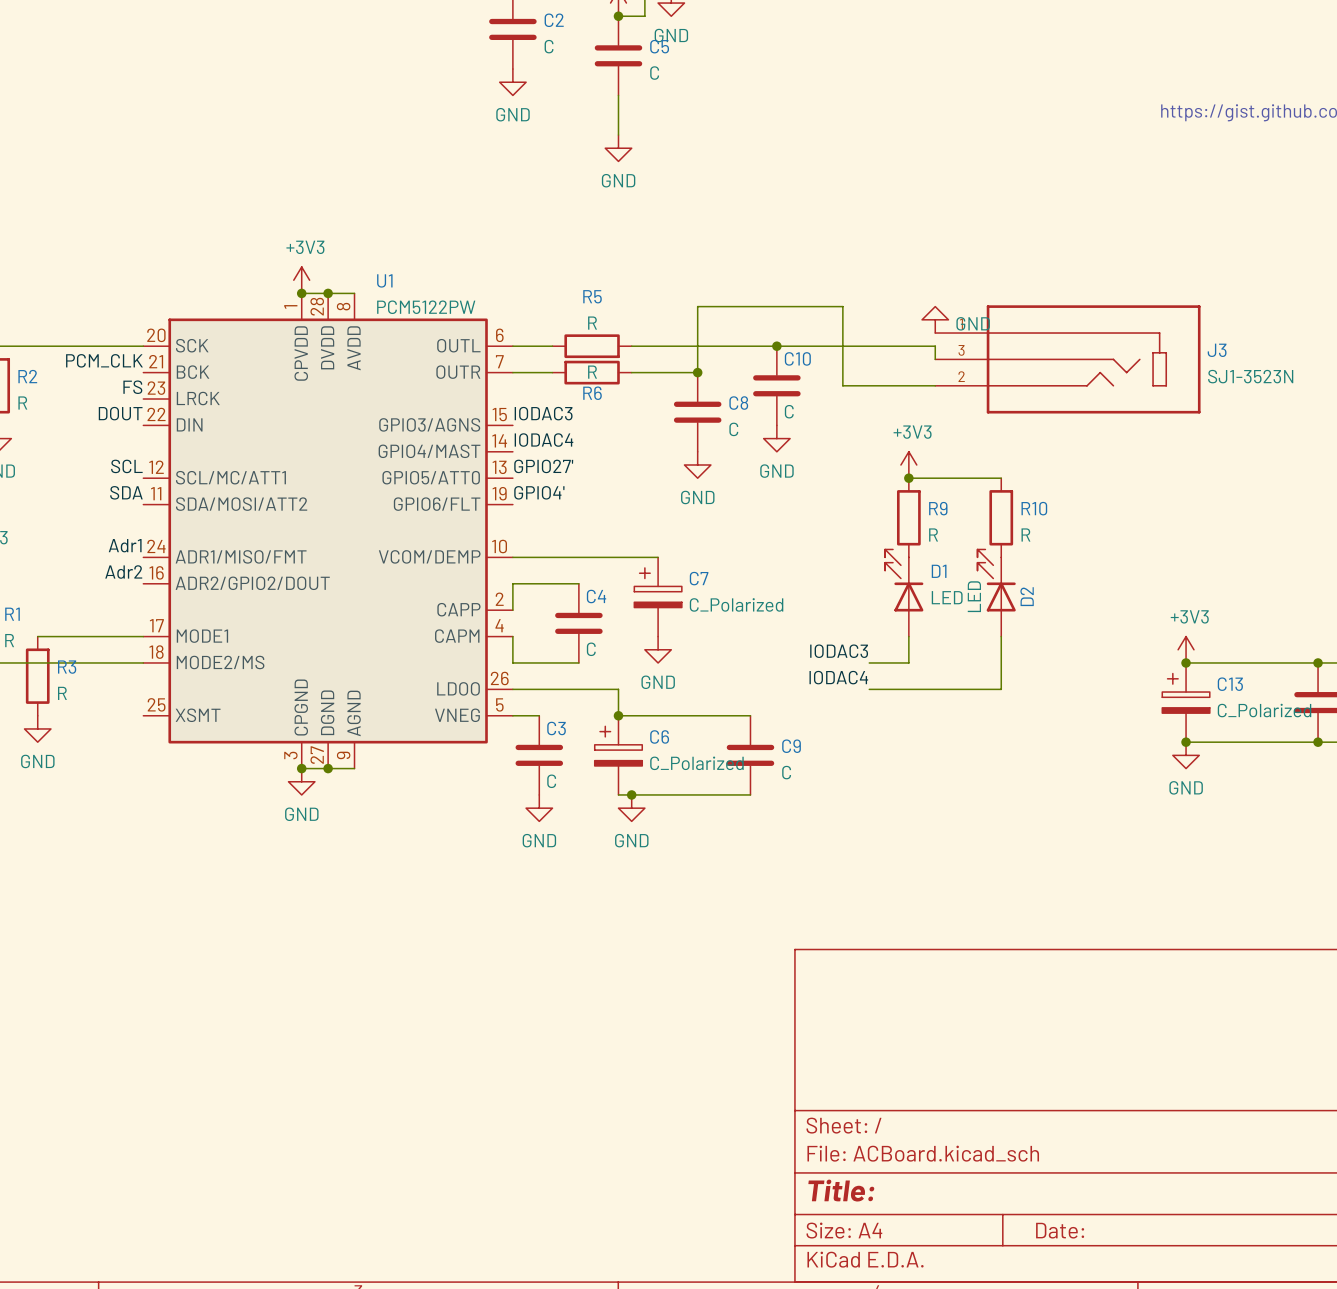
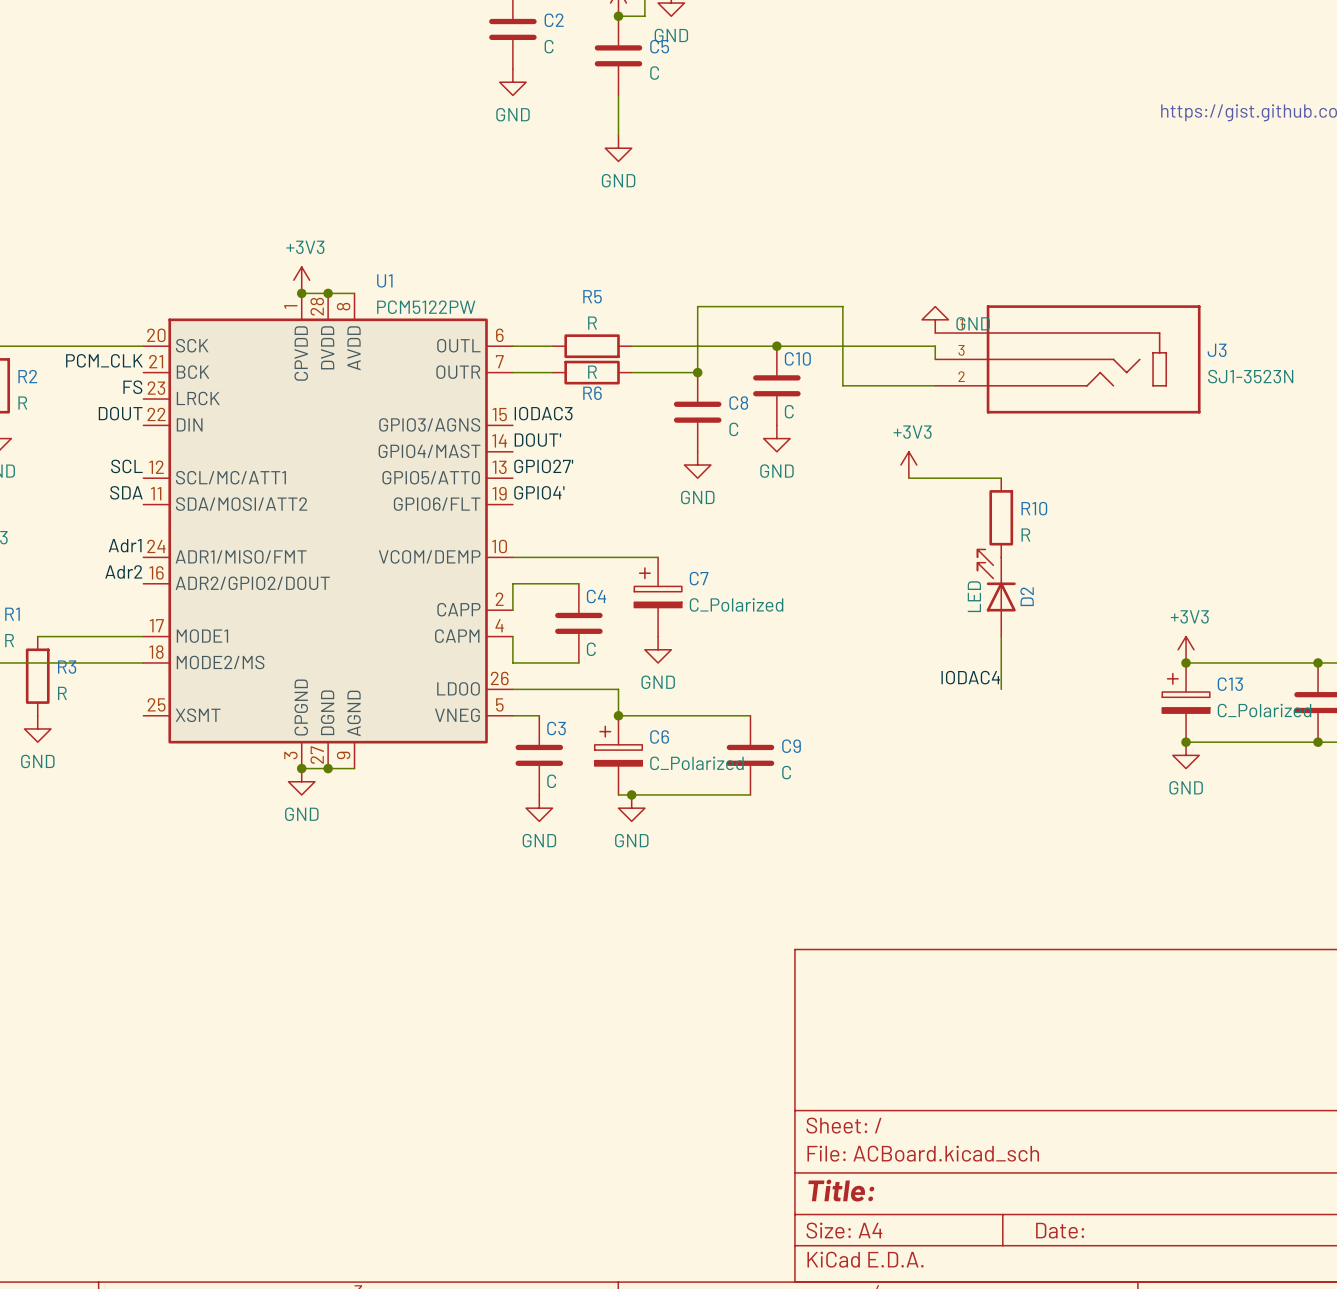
label: IODAC4 (543, 440) -> DOUT' (537, 440)
junction: (908, 478) -> none
R9: R (908, 517) -> none
D1: LED (904, 593) -> none
wire: (908, 636) (908, 662) (869, 662) -> none
label: IODAC3 (839, 651) -> none
label position: IODAC4 (838, 677) -> IODAC4 (970, 677)
wire: (869, 689) (1001, 689) -> none

